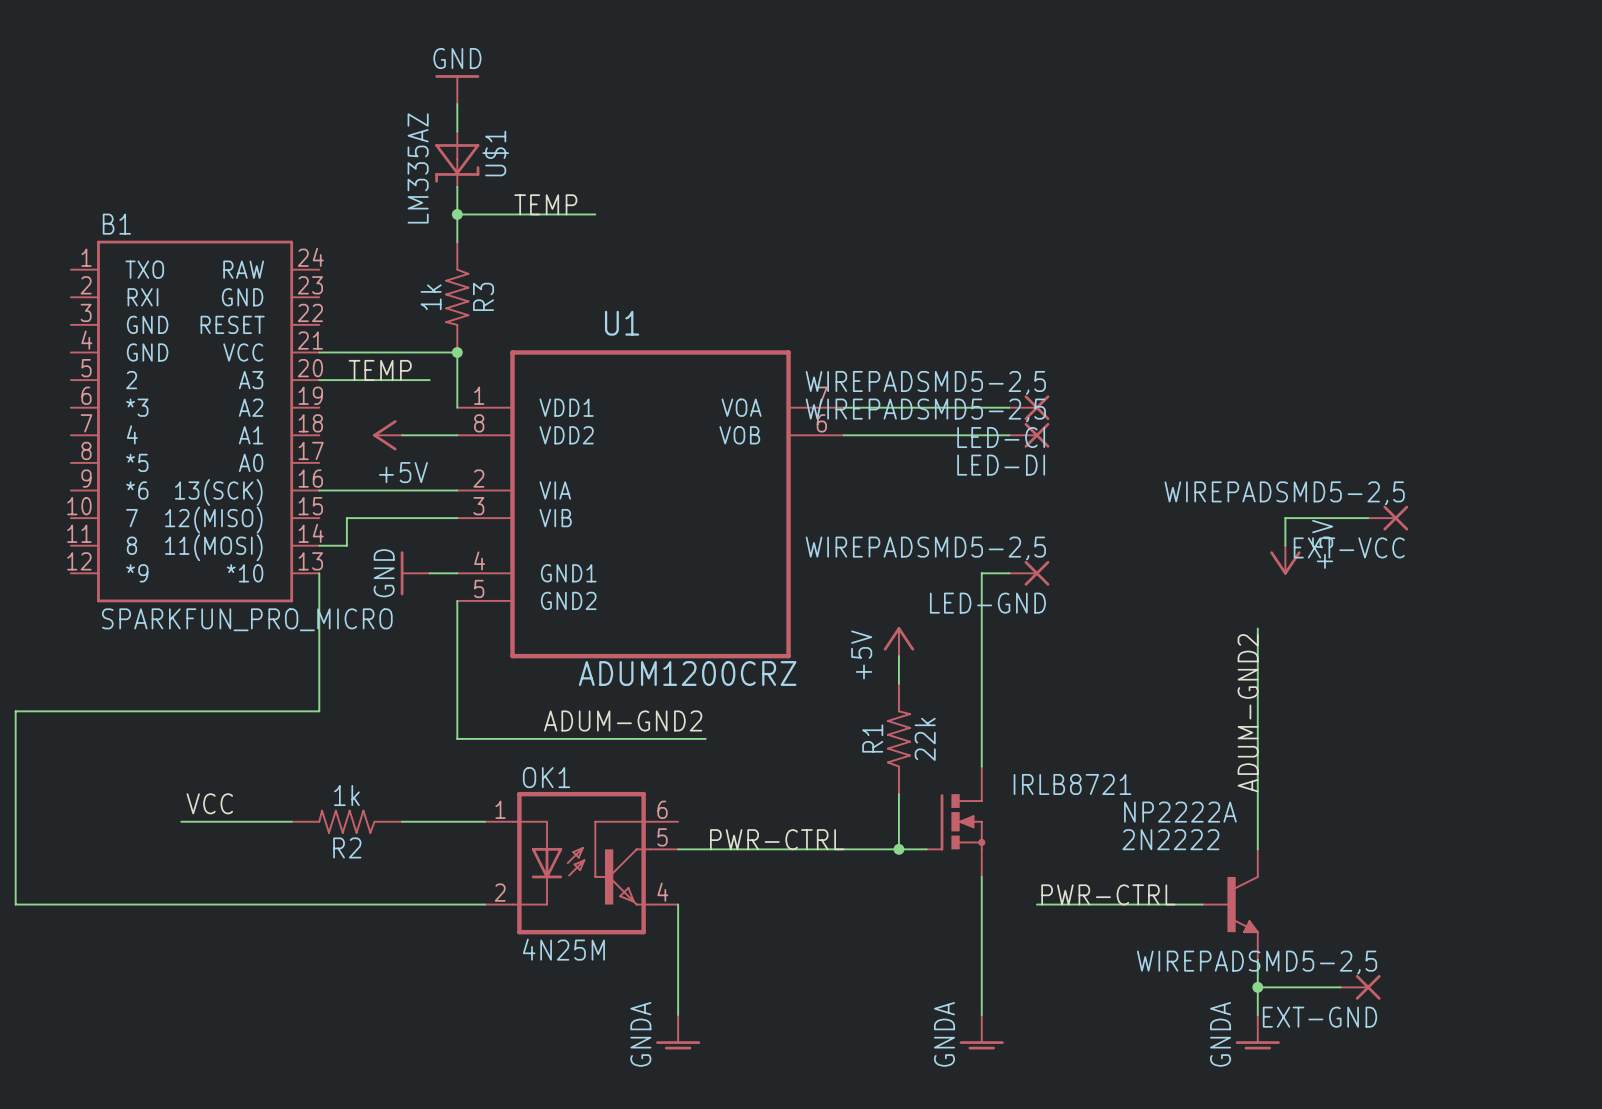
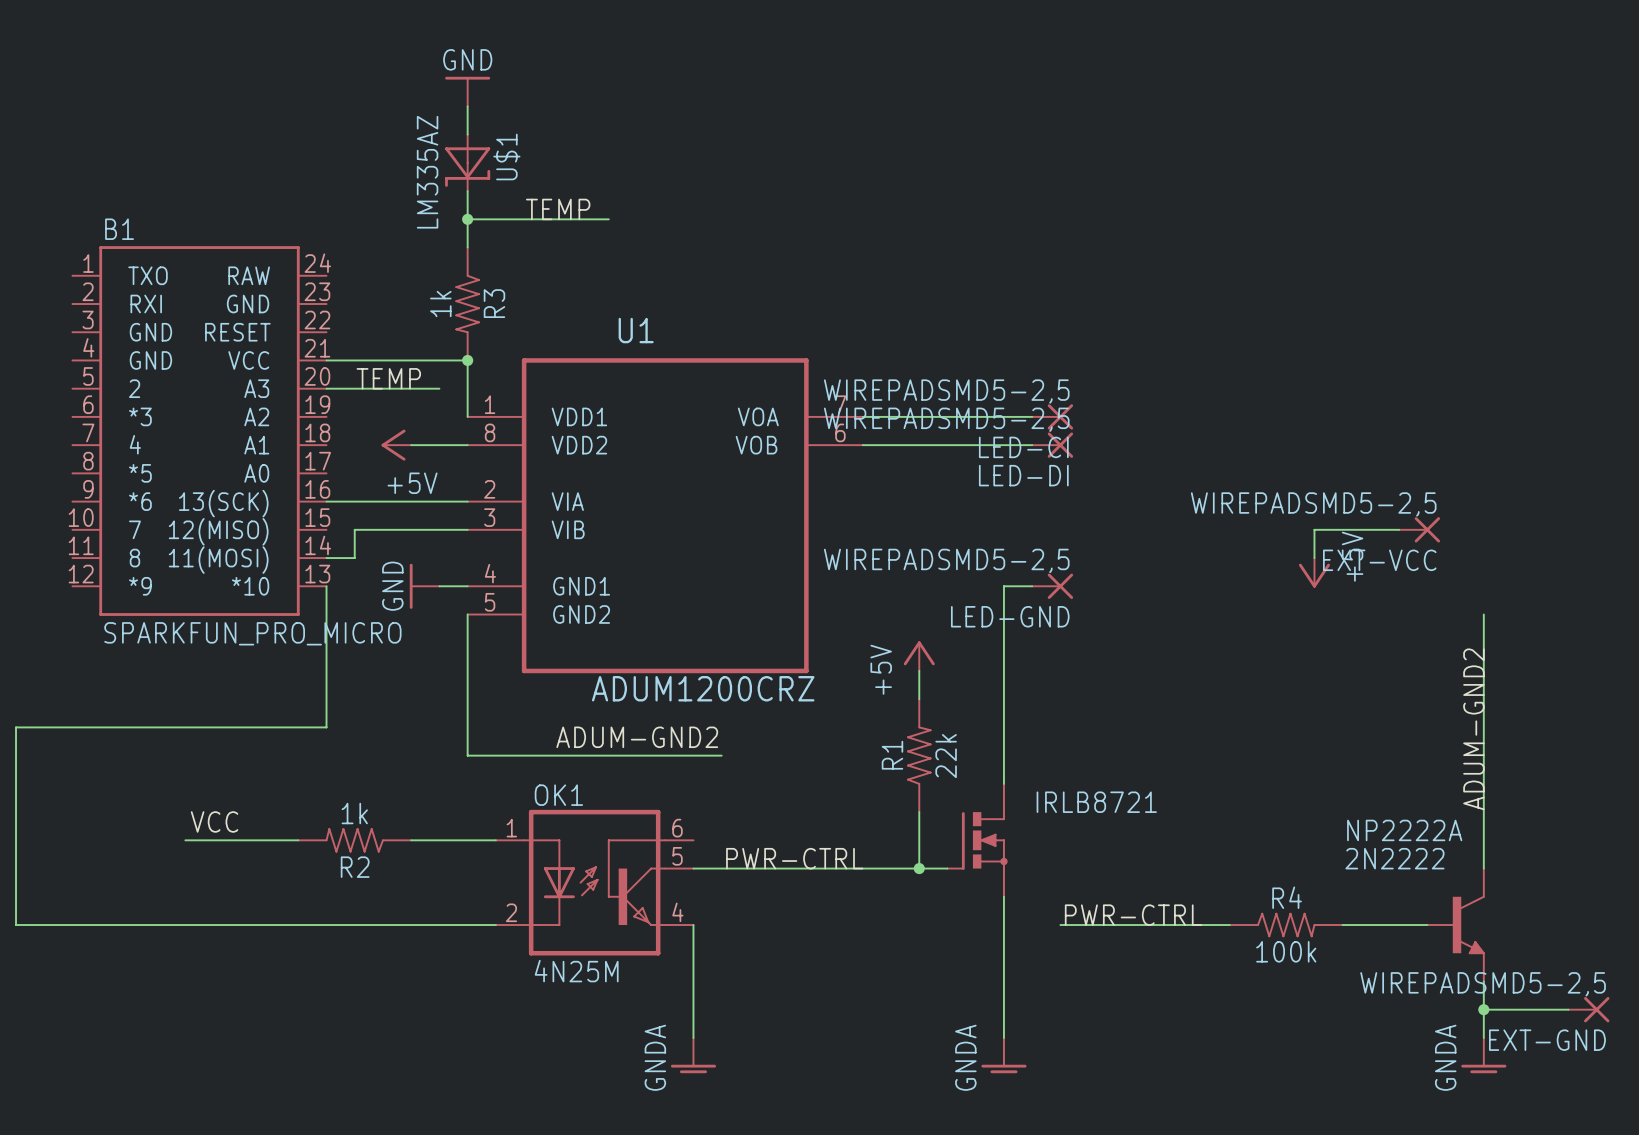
wire: none -> (1483, 614) (1483, 868)
wire: (1257, 628) (1257, 849) -> none
label position: ADUM-GND2 (1248, 713) -> ADUM-GND2 (1473, 729)
NP2222A position: (1230, 904) -> (1456, 925)
R4: none -> 100k (1286, 925)
wire: (1257, 959) (1257, 1014) -> (1483, 981) (1483, 1037)
wire: (1257, 987) (1340, 987) -> (1342, 925) (1427, 925)
junction: (1257, 987) -> none
EXT-GND position: (1360, 987) -> (1588, 1009)
wire: none -> (1483, 1009) (1568, 1009)
junction: none -> (1483, 1009)
power symbol position: GNDA (1257, 1032) -> GNDA (1483, 1055)

